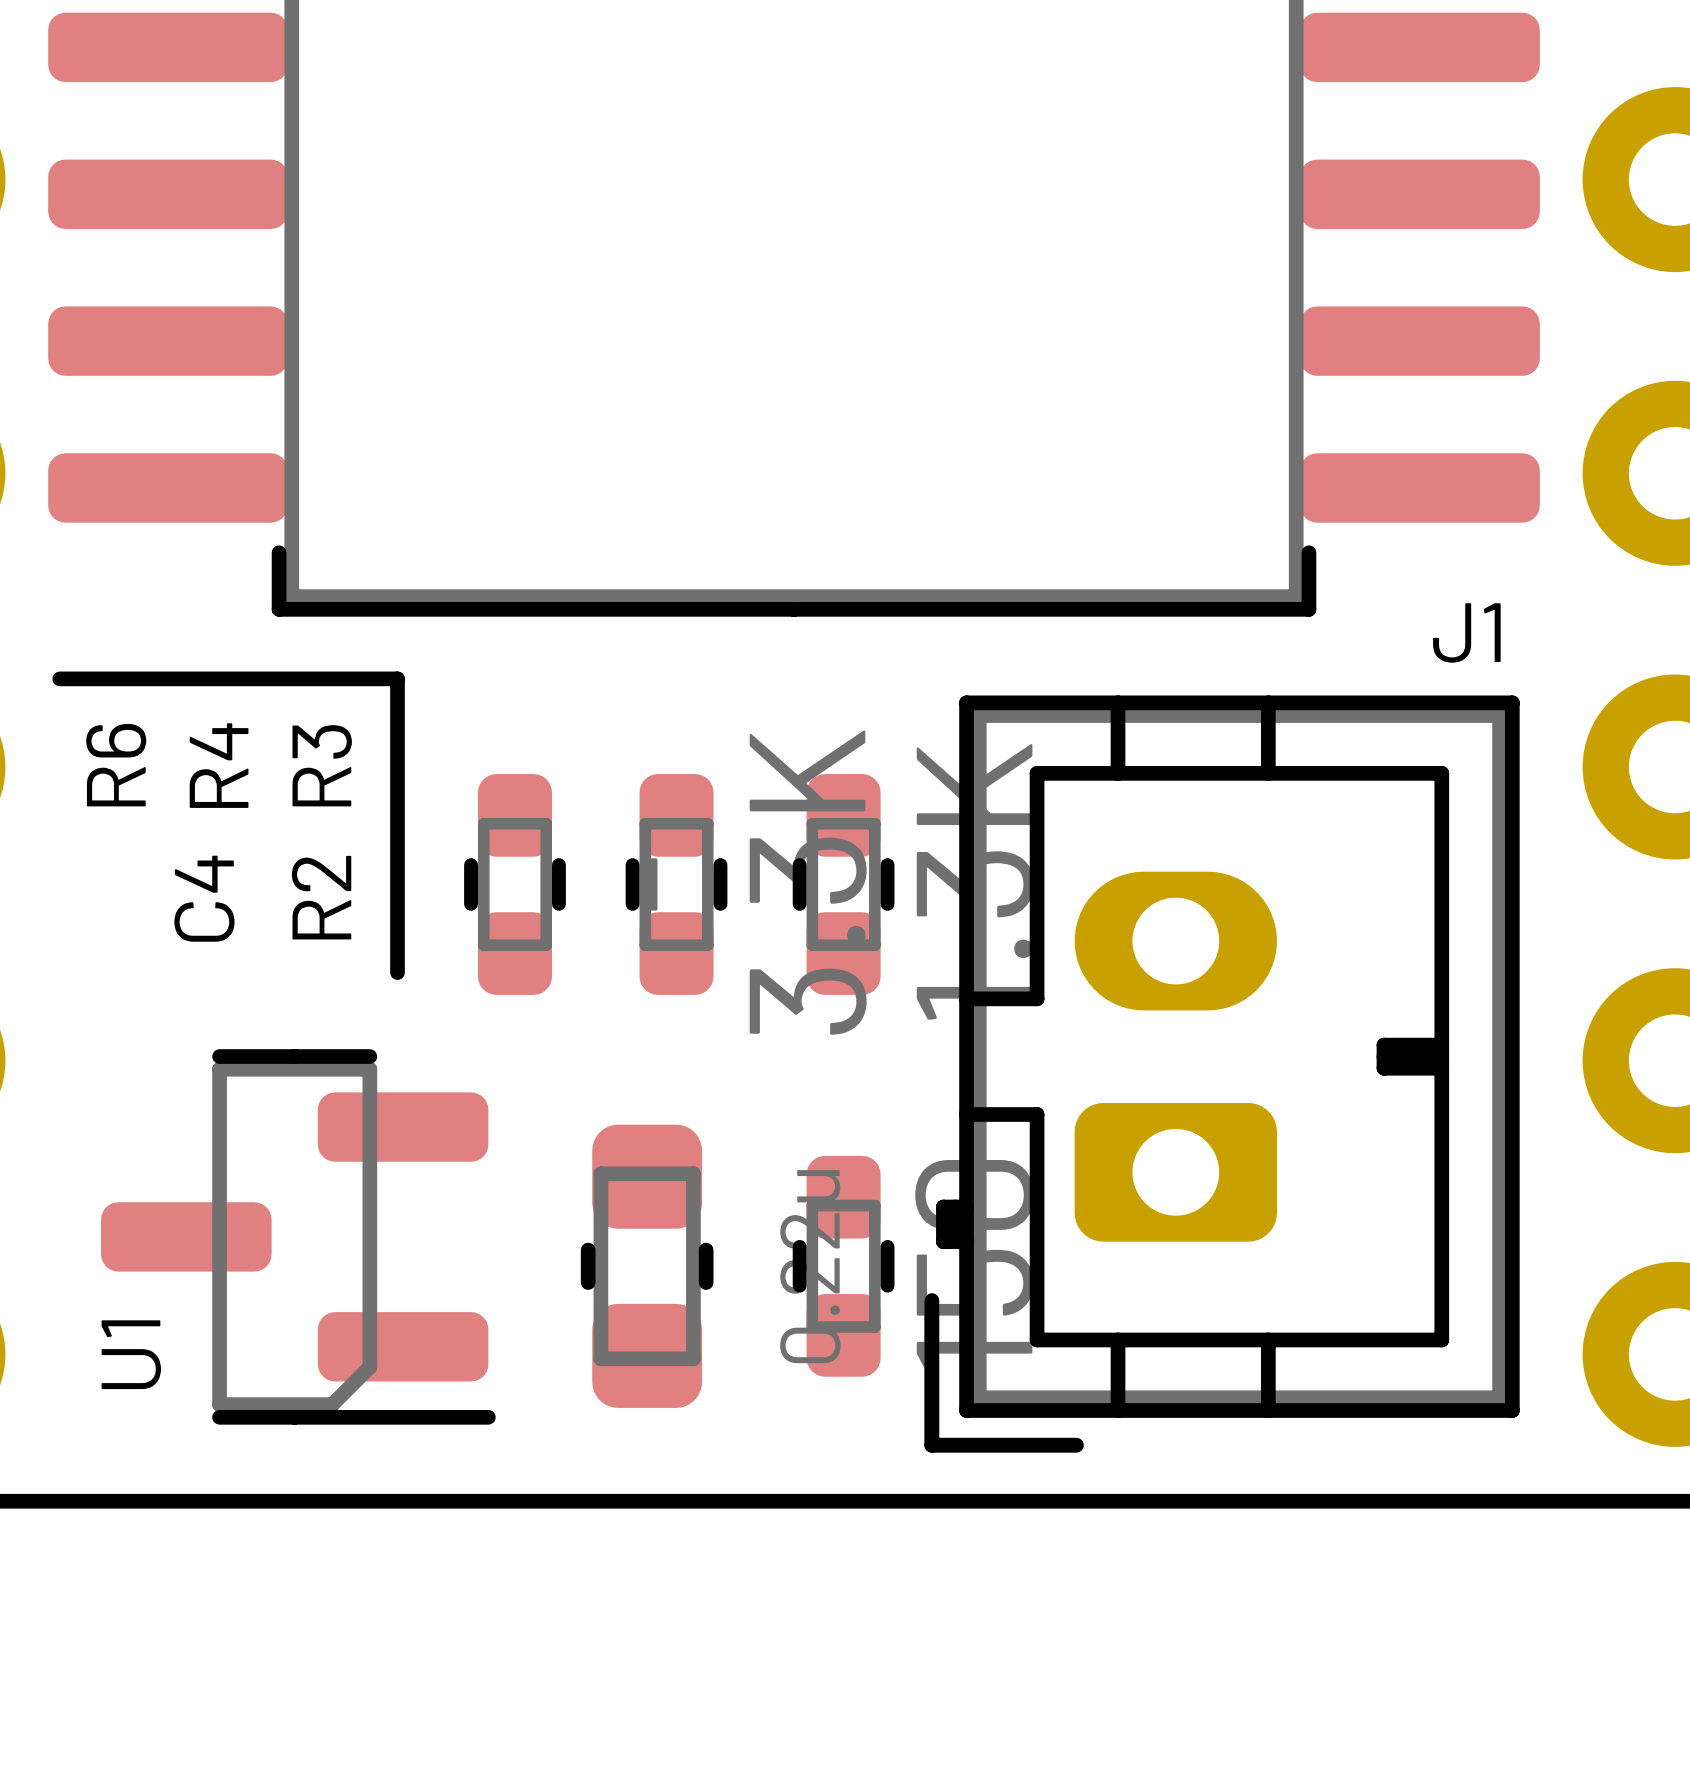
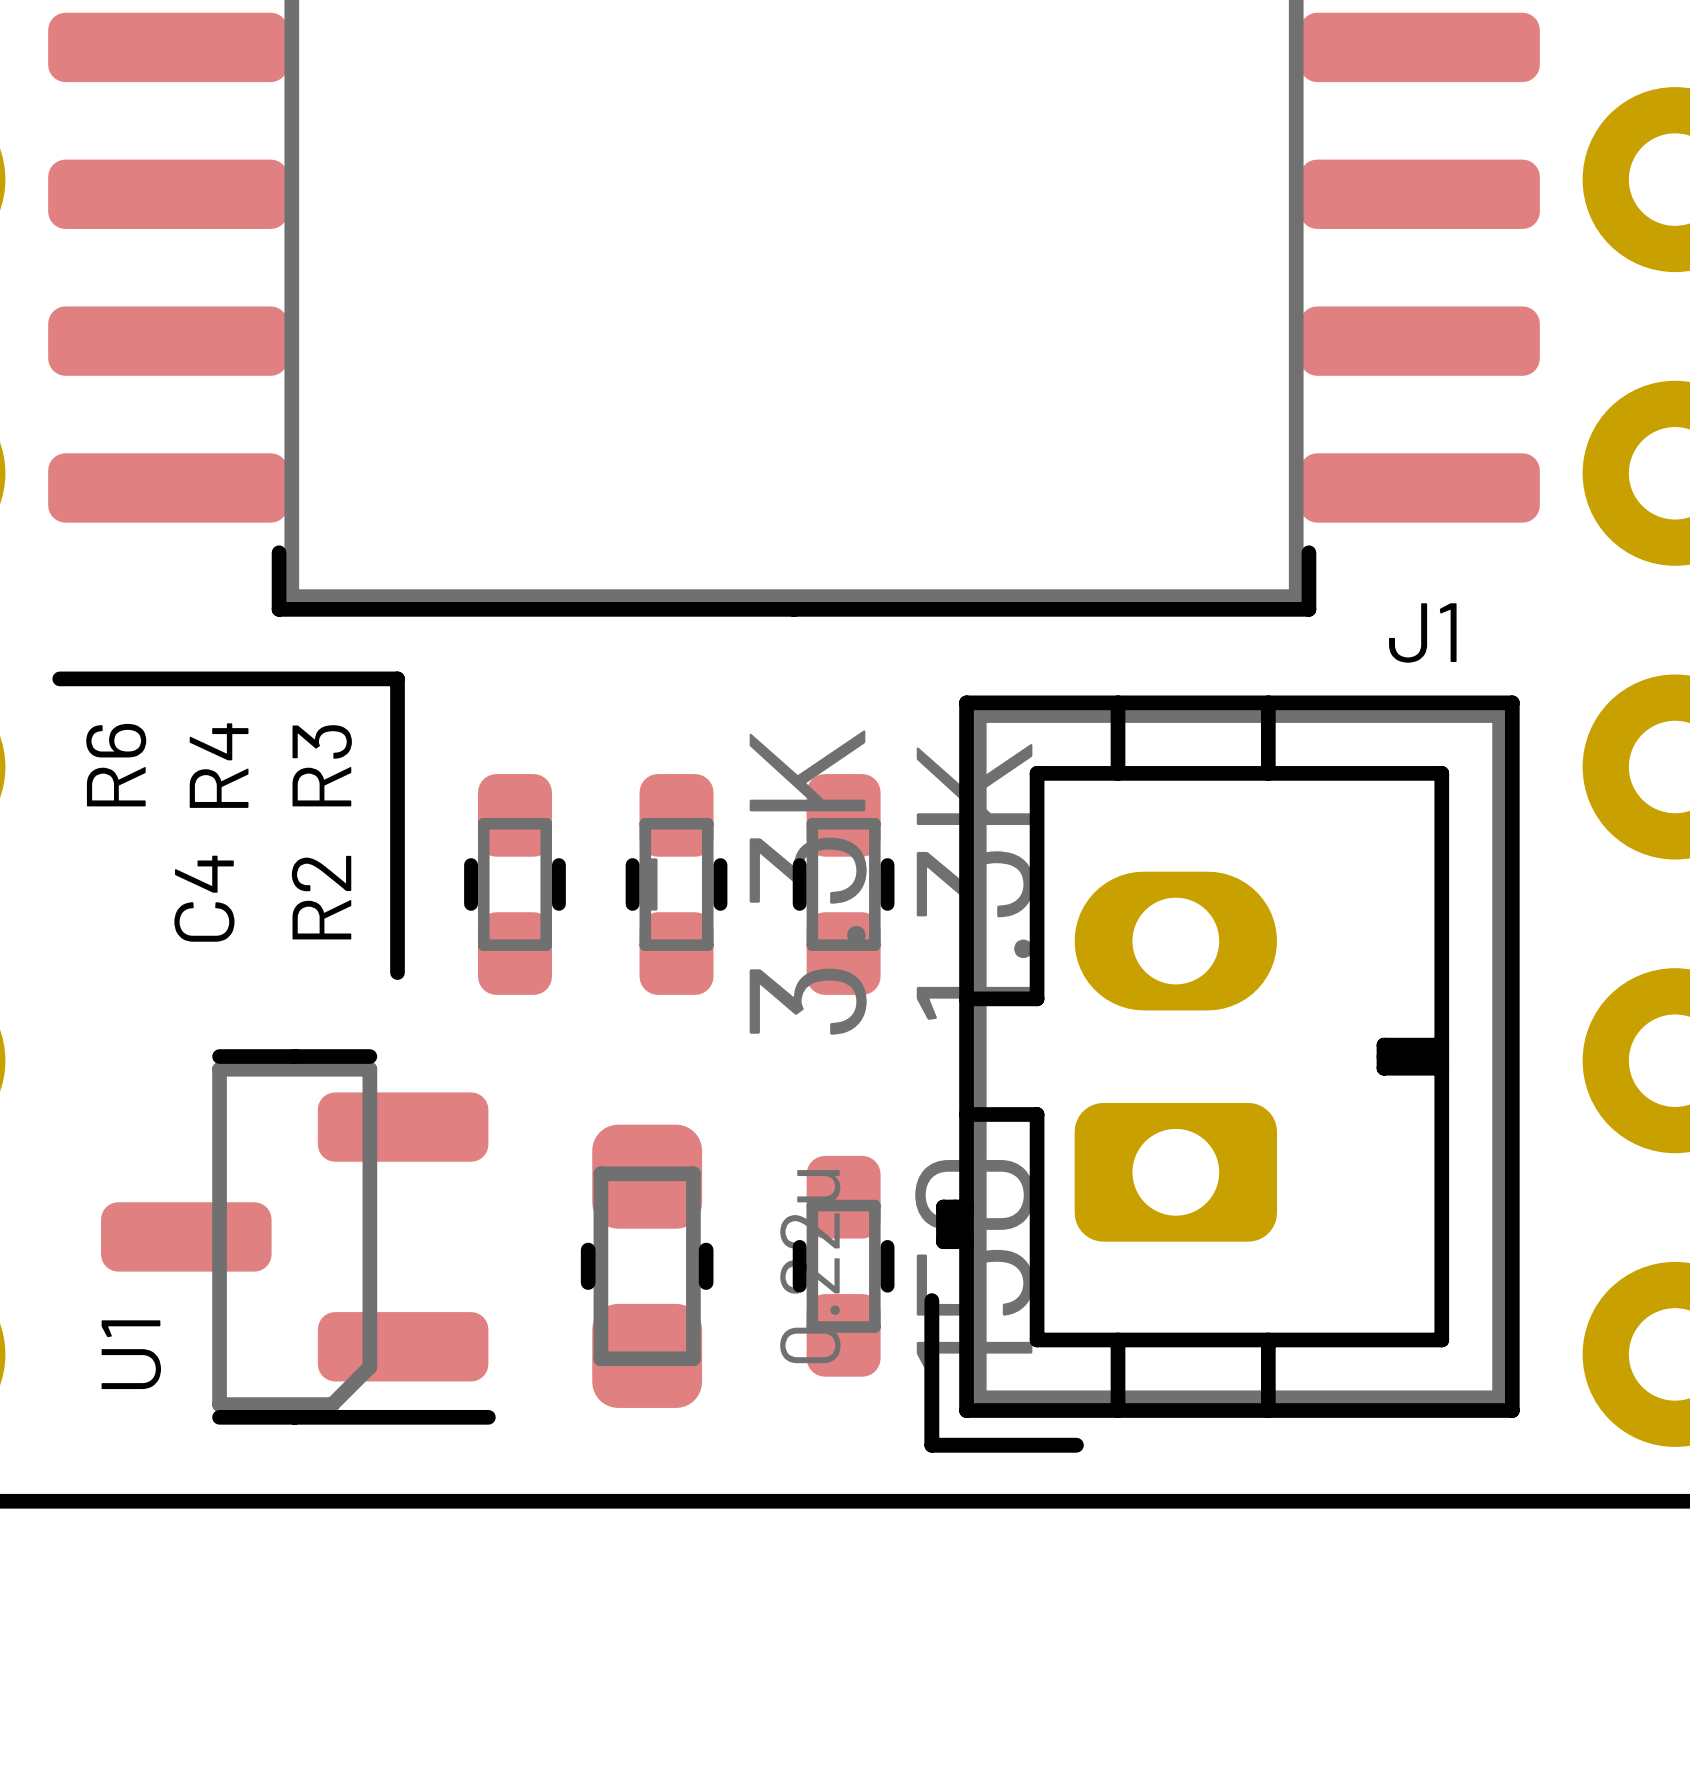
J1 name position: J1 (1466, 632) -> J1 (1422, 632)

